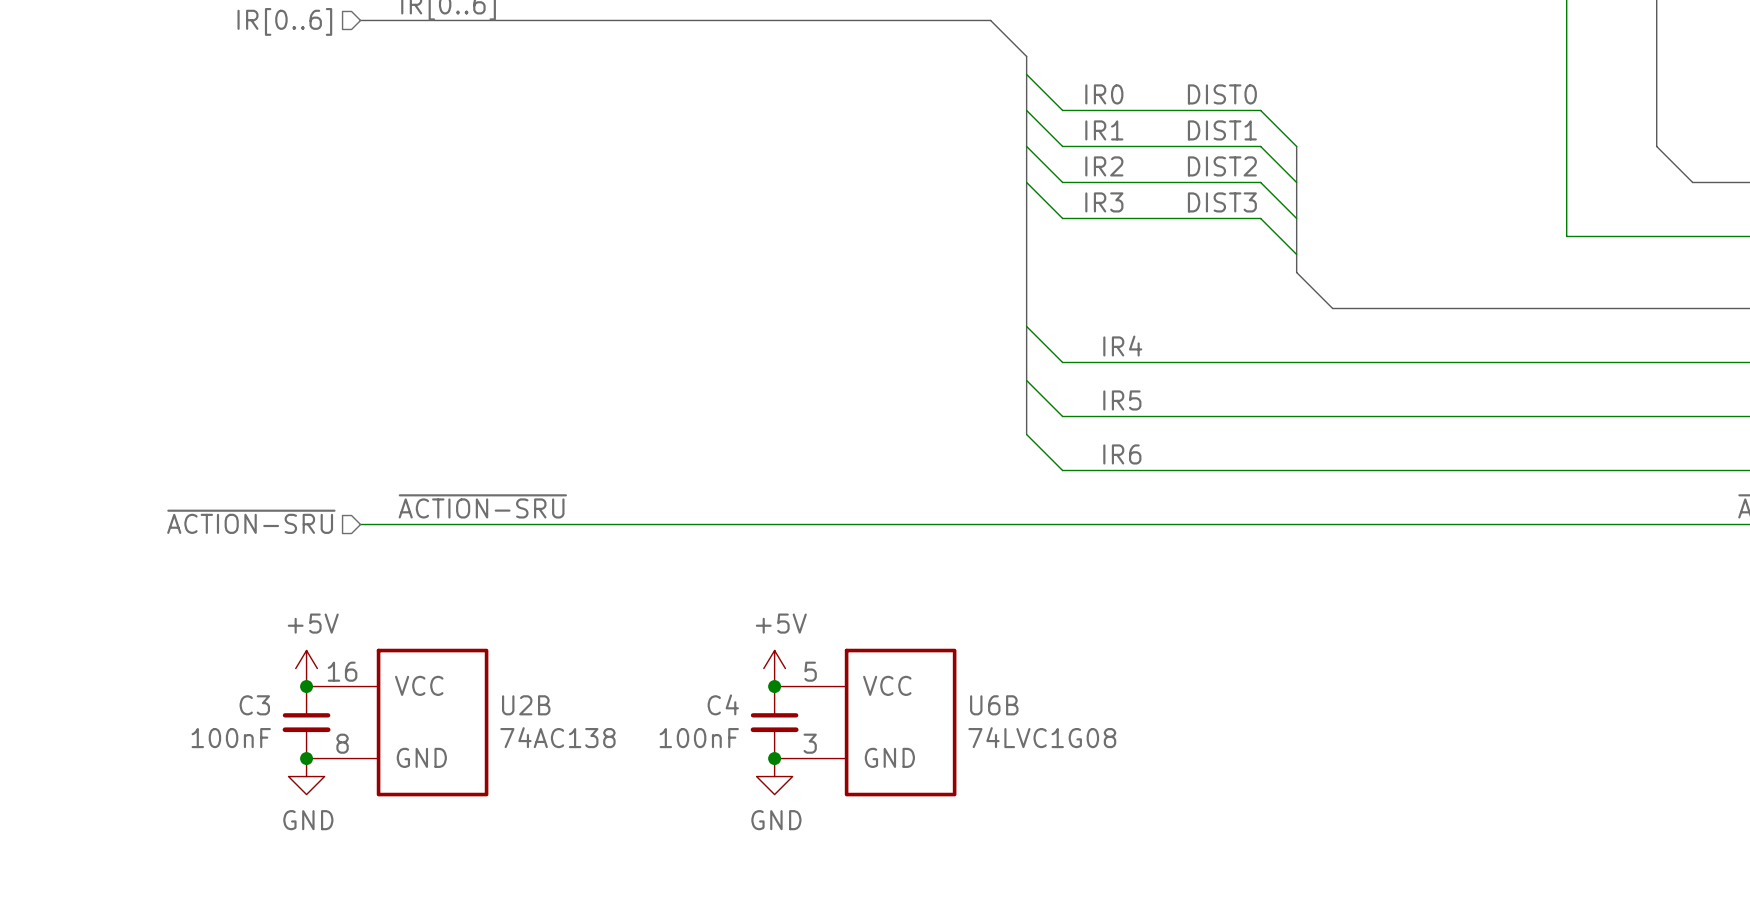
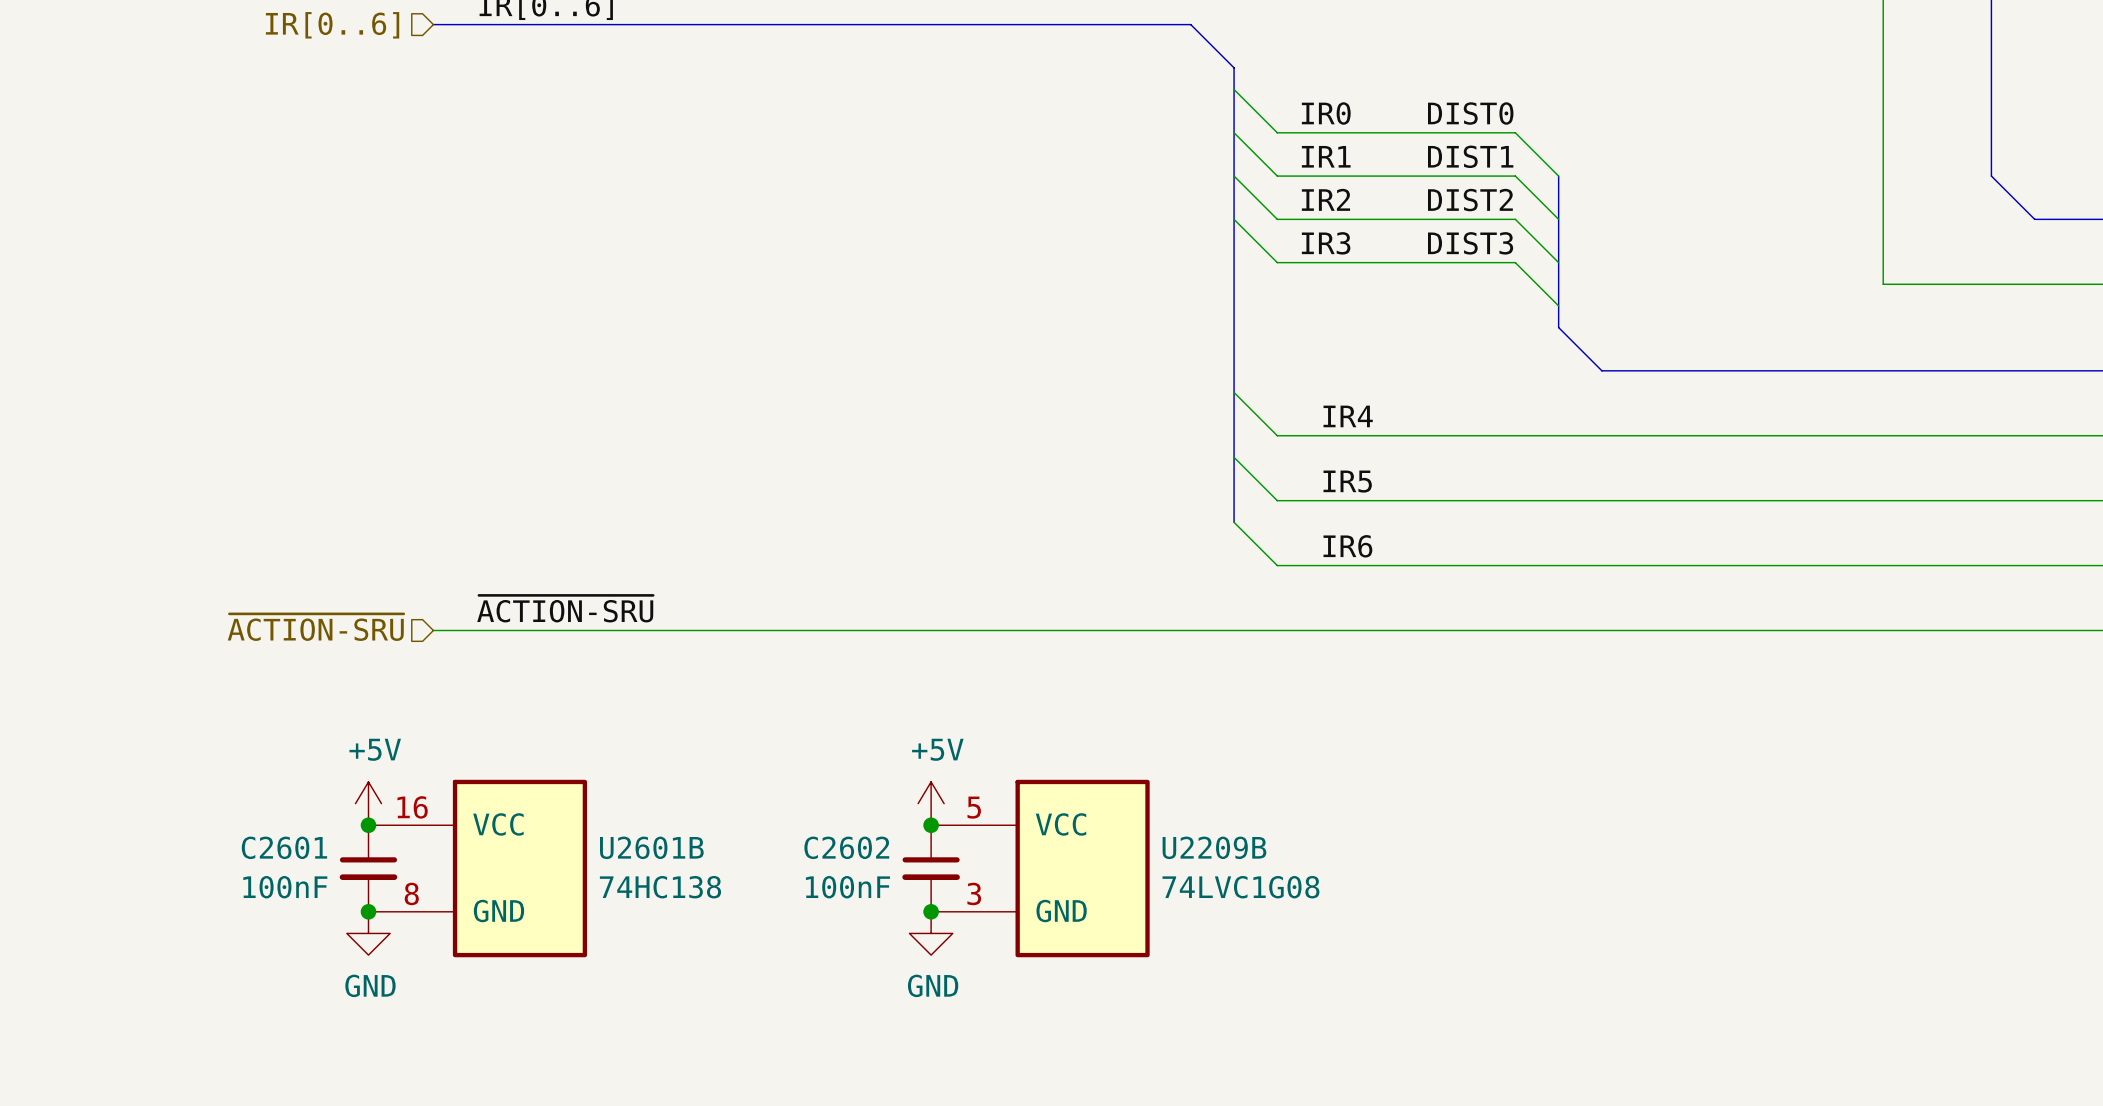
C4 name: C4 (723, 704) -> C2602 (846, 847)
C3 name: C3 (254, 705) -> C2601 (284, 847)
U2B name: U2B (526, 705) -> U2601B (651, 847)
U6B name: U6B (994, 705) -> U2209B (1214, 847)
U2B value: 74AC138 (557, 737) -> 74HC138 (660, 887)

